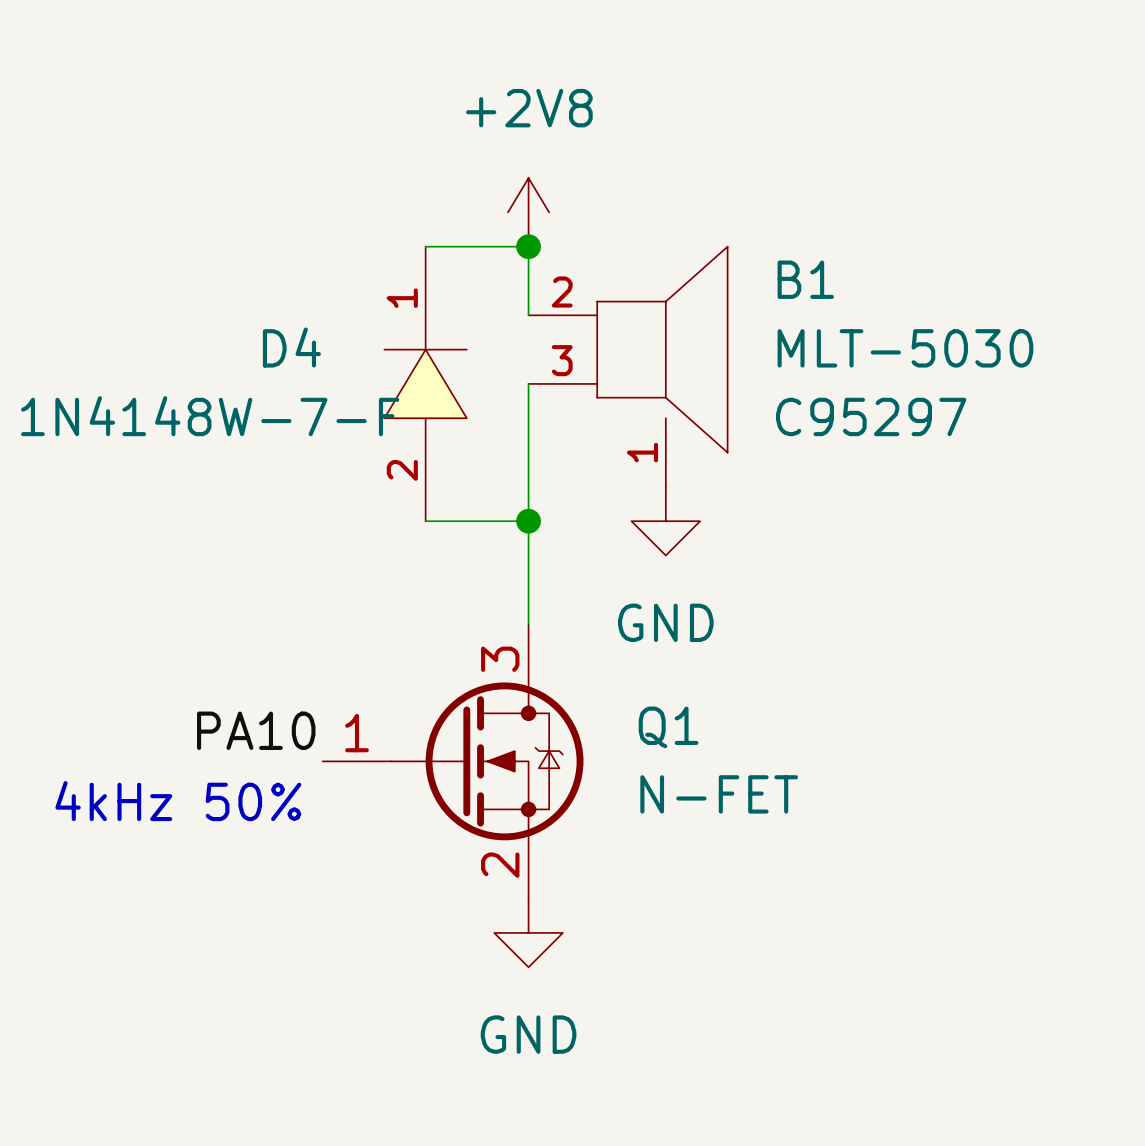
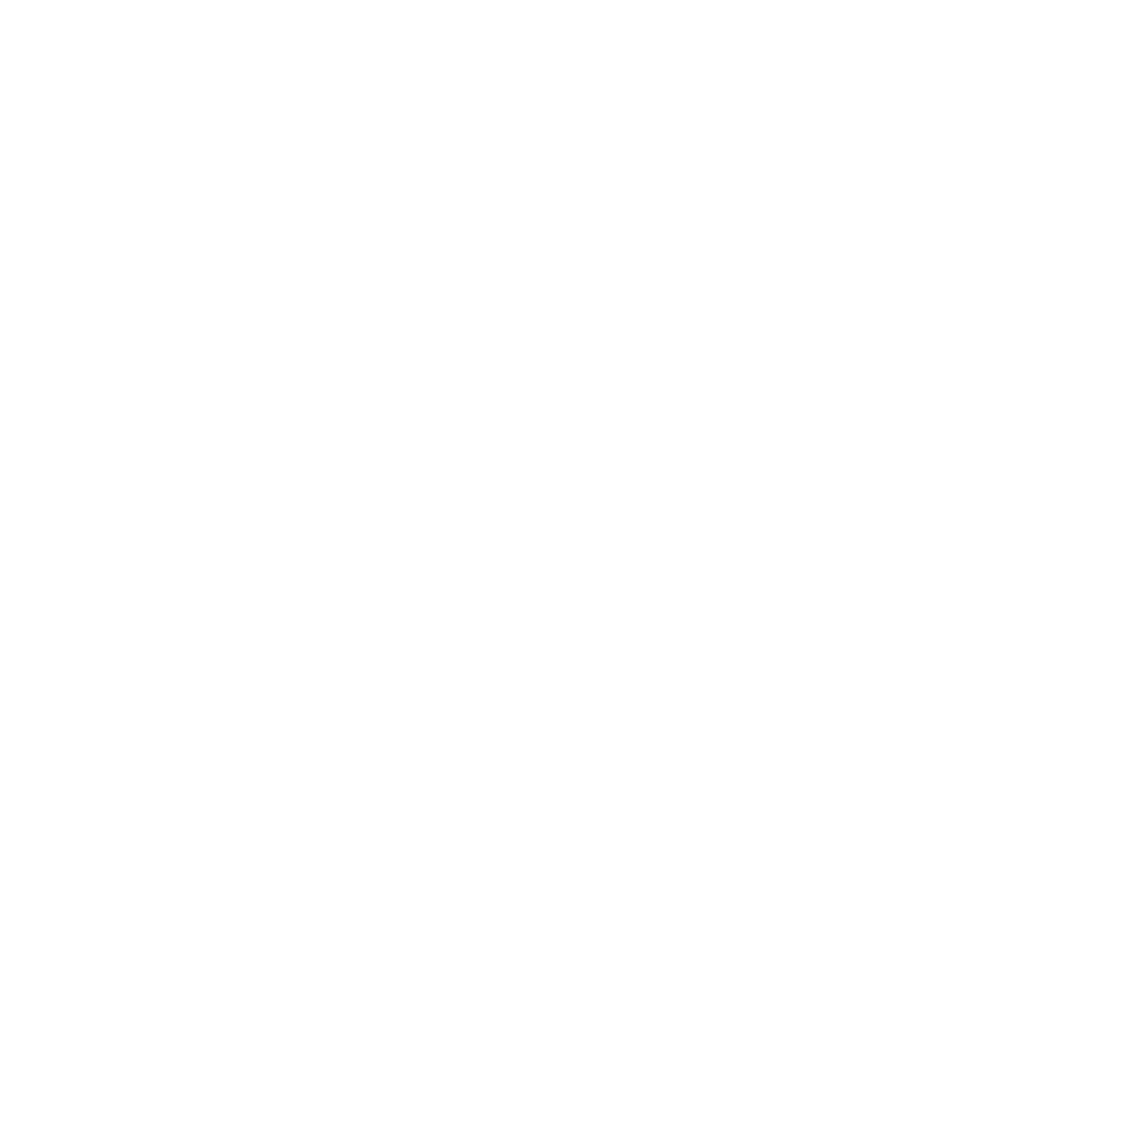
power symbol: +2V8 (528, 212) -> none
wire: (425, 246) (528, 246) (528, 315) -> none
junction: (528, 246) -> none
B1: MLT-5030 (628, 366) -> none
D4: 1N4148W-7-F (425, 383) -> none
wire: (528, 383) (528, 624) -> none
wire: (425, 521) (528, 521) -> none
junction: (528, 521) -> none
power symbol: GND (665, 521) -> none
label: PA10 (256, 730) -> none
Q1: N-FET (453, 761) -> none
text: 4kHz 50% (178, 801) -> none
power symbol: GND (528, 932) -> none

